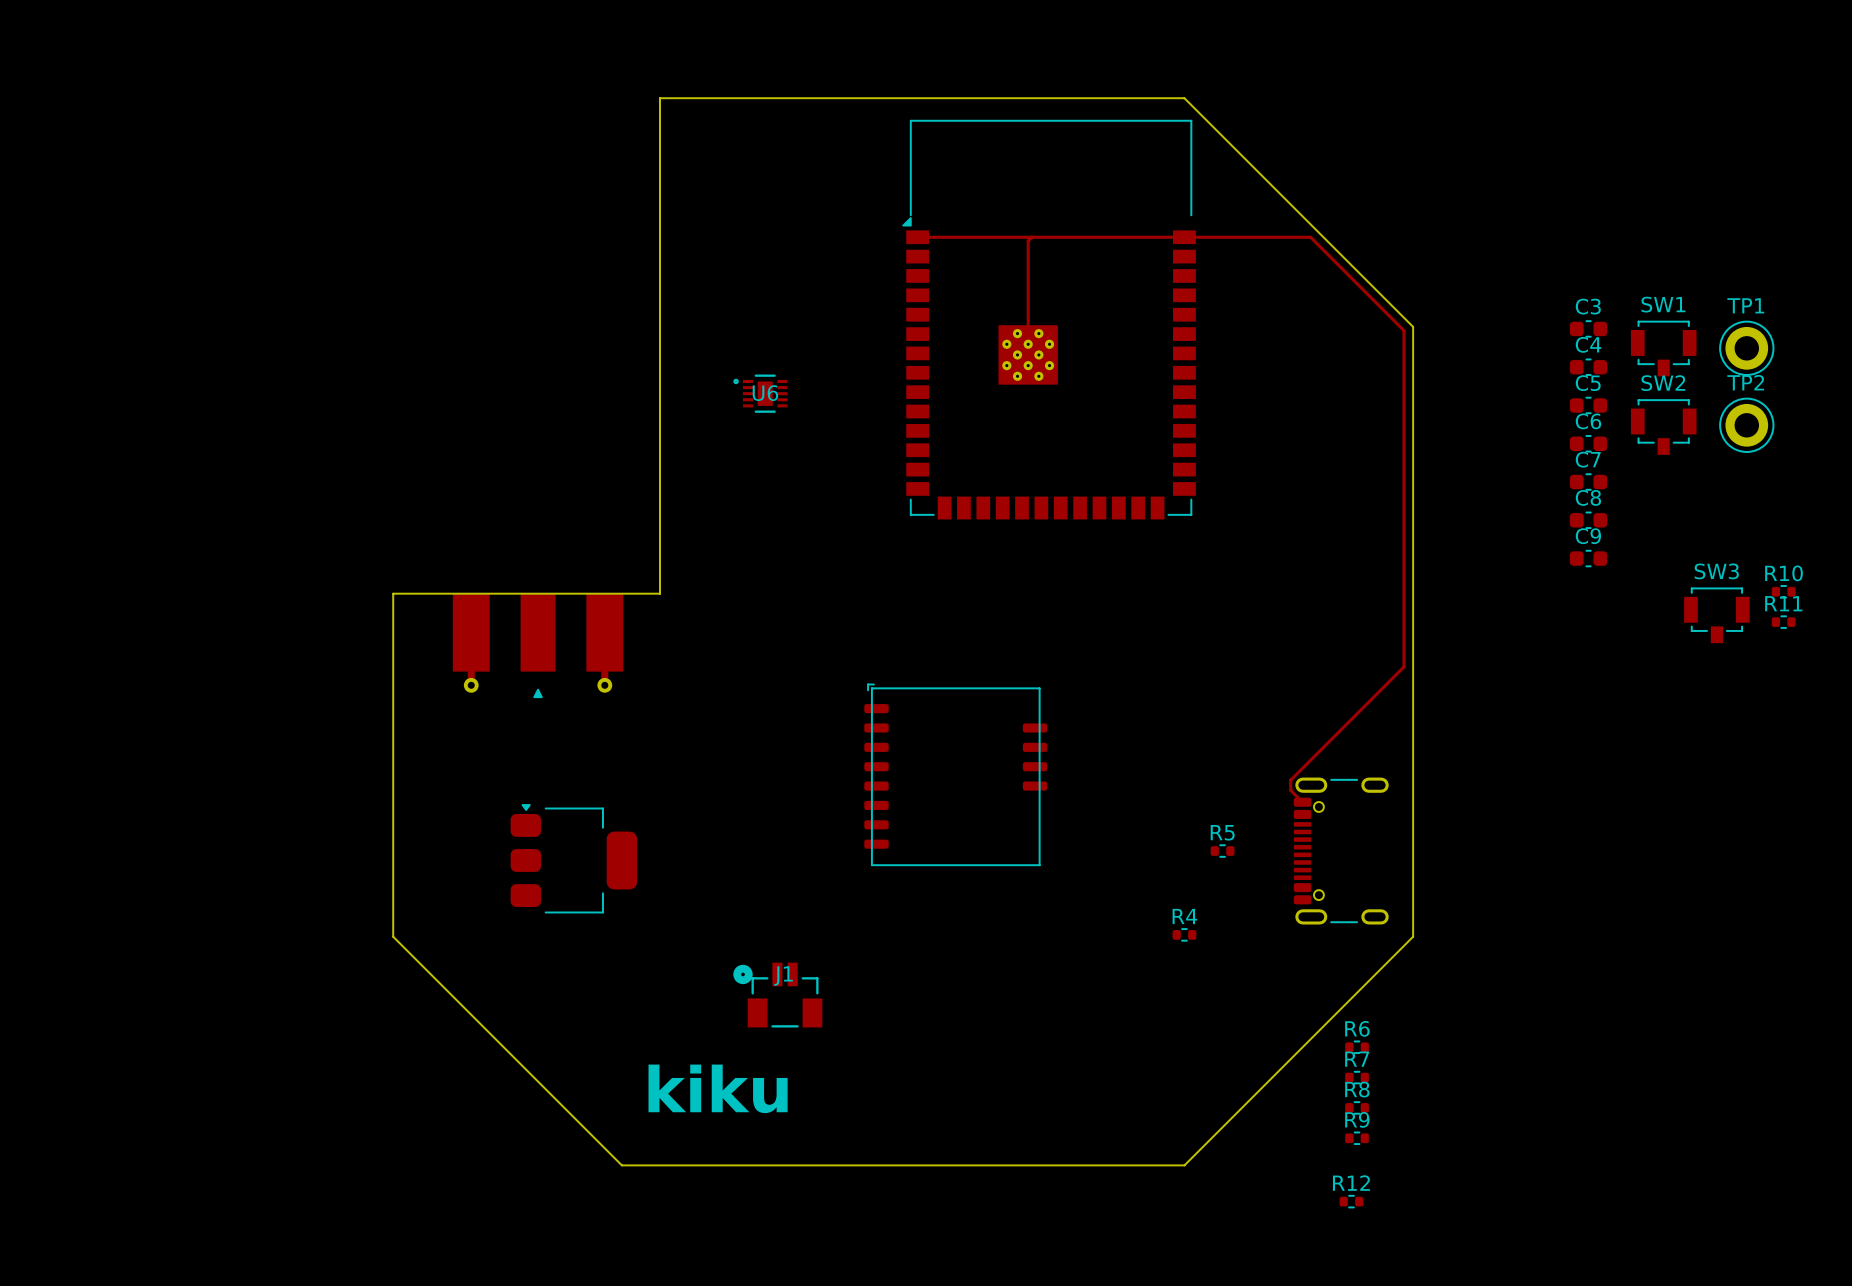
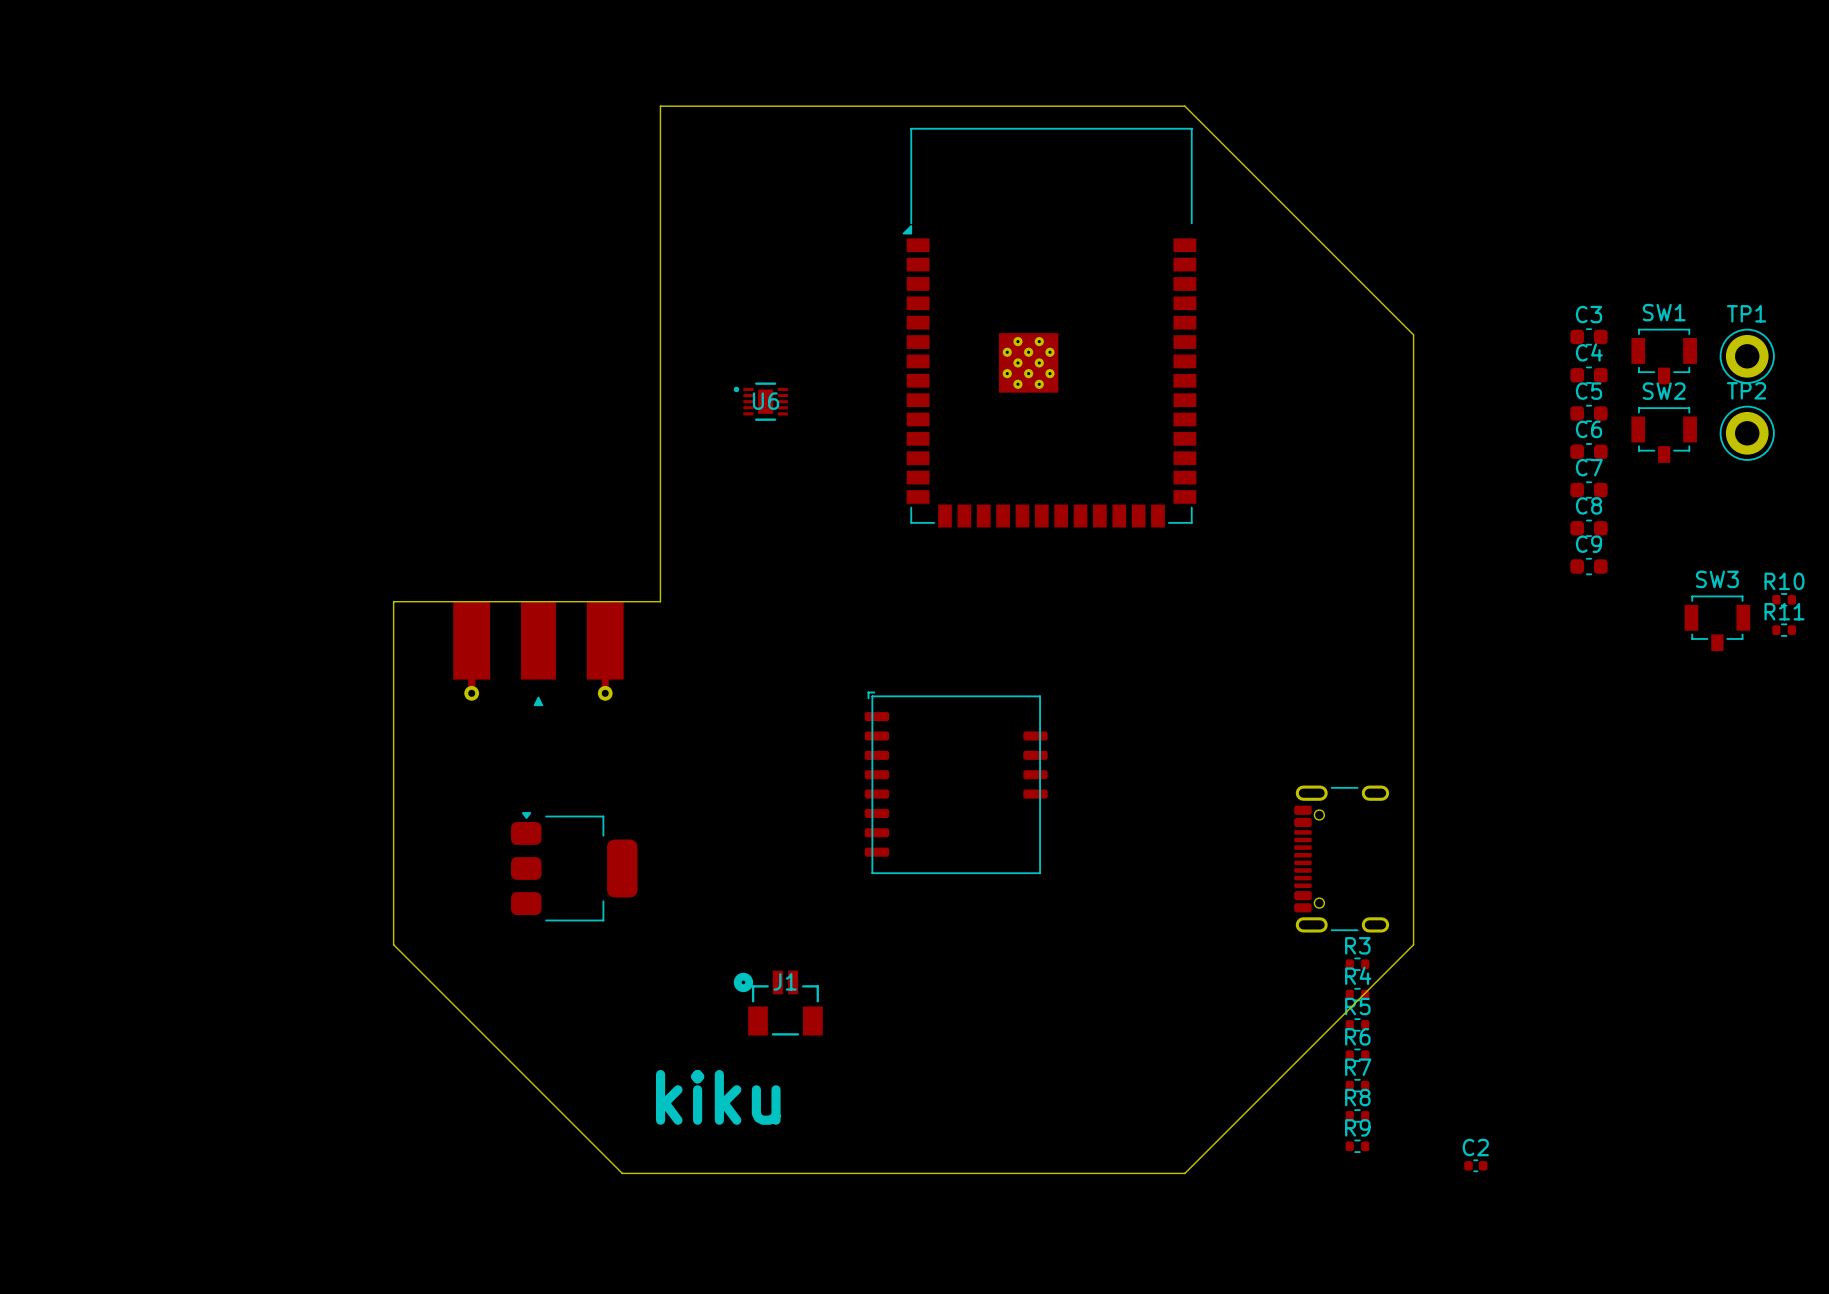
track: (917, 237) (1310, 237) (1403, 330) (1403, 666) (1290, 780) (1290, 790) (1302, 802) -> none
track: (1031, 237) (1028, 241) (1028, 354) -> none
R5 position: (1222, 851) -> (1357, 1024)
R4 position: (1184, 934) -> (1357, 994)
R3: none -> (1357, 964)
C2: none -> (1475, 1165)
R12: (1351, 1201) -> none

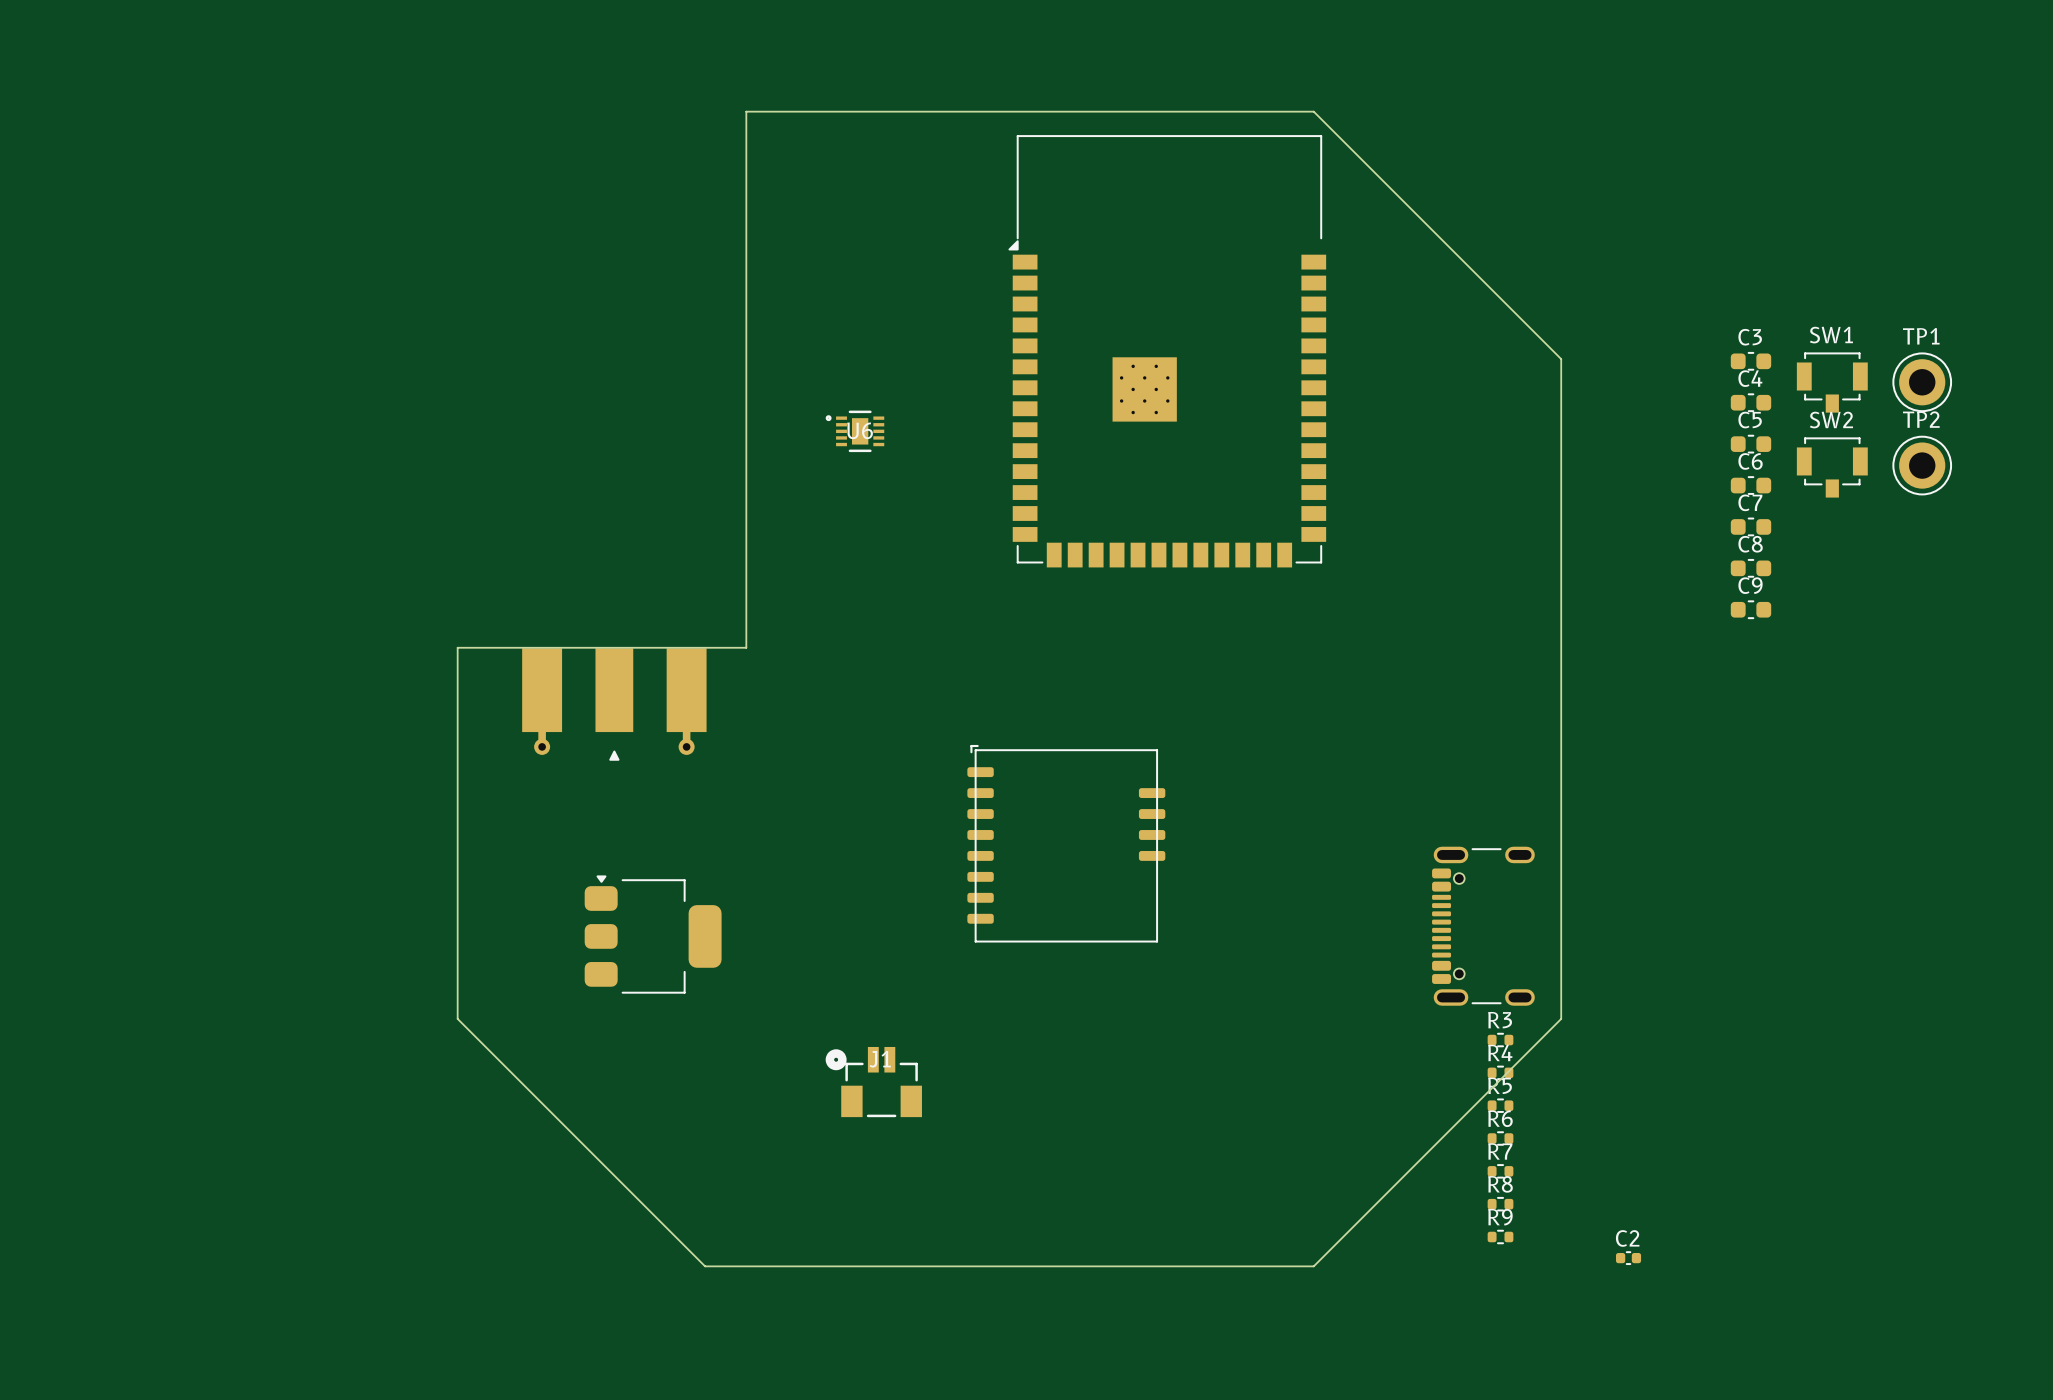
R10: (1784, 599) -> none
SW3: (1717, 623) -> none
R11: (1784, 630) -> none
text: kiku (718, 1097) -> none

